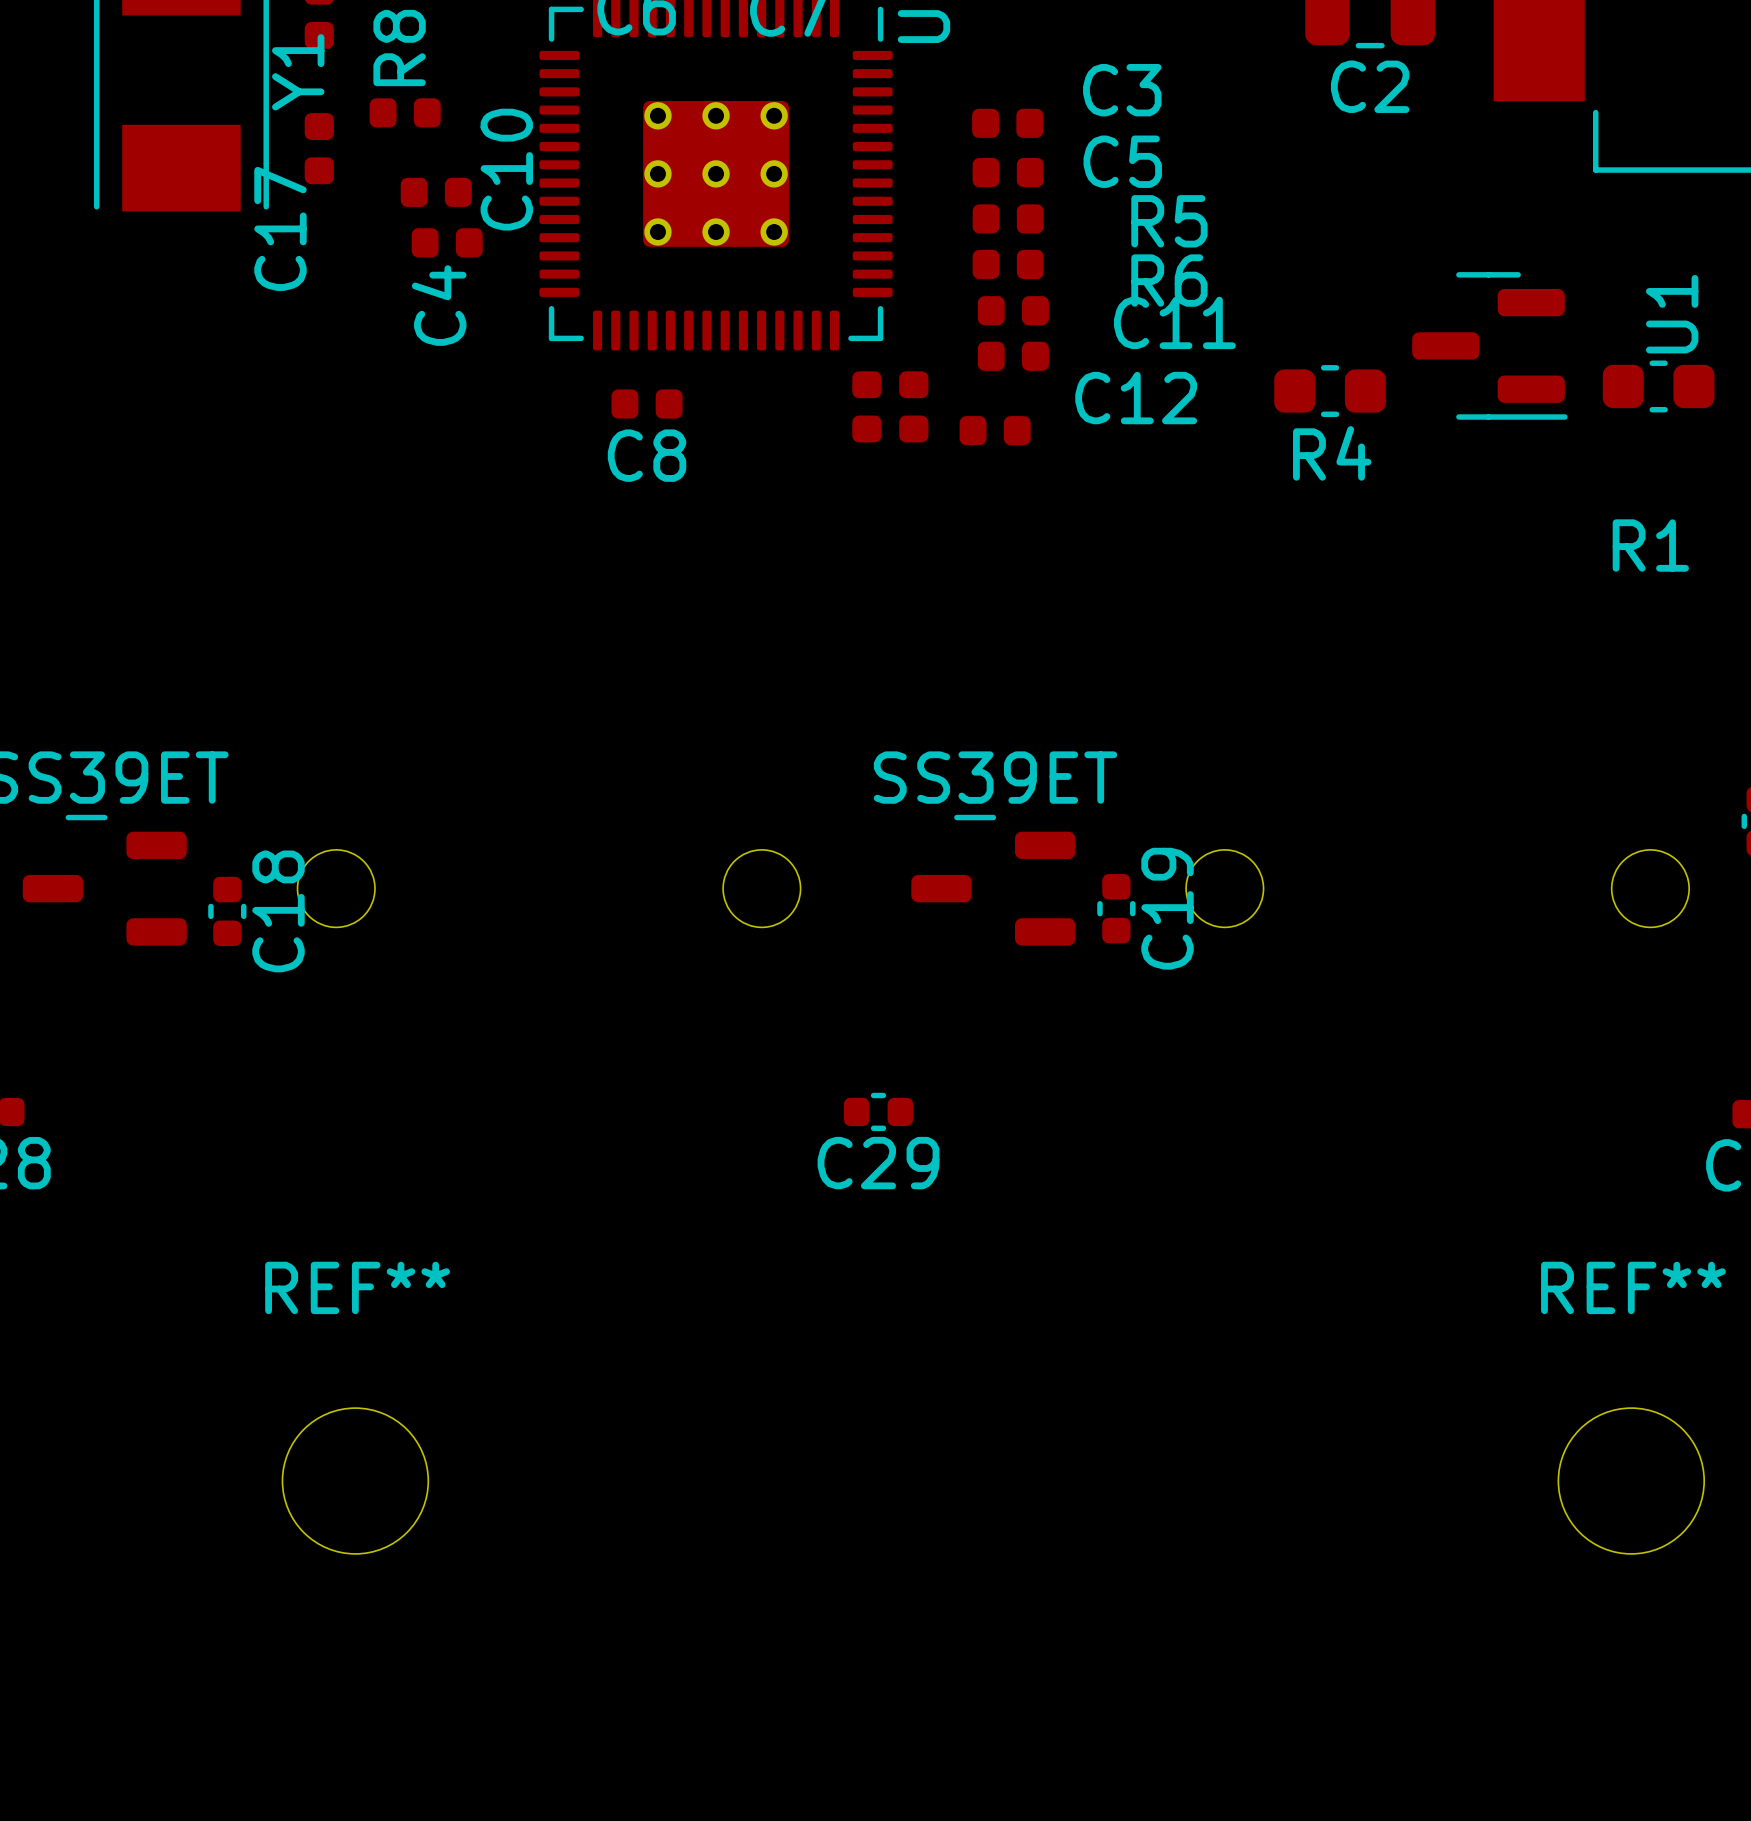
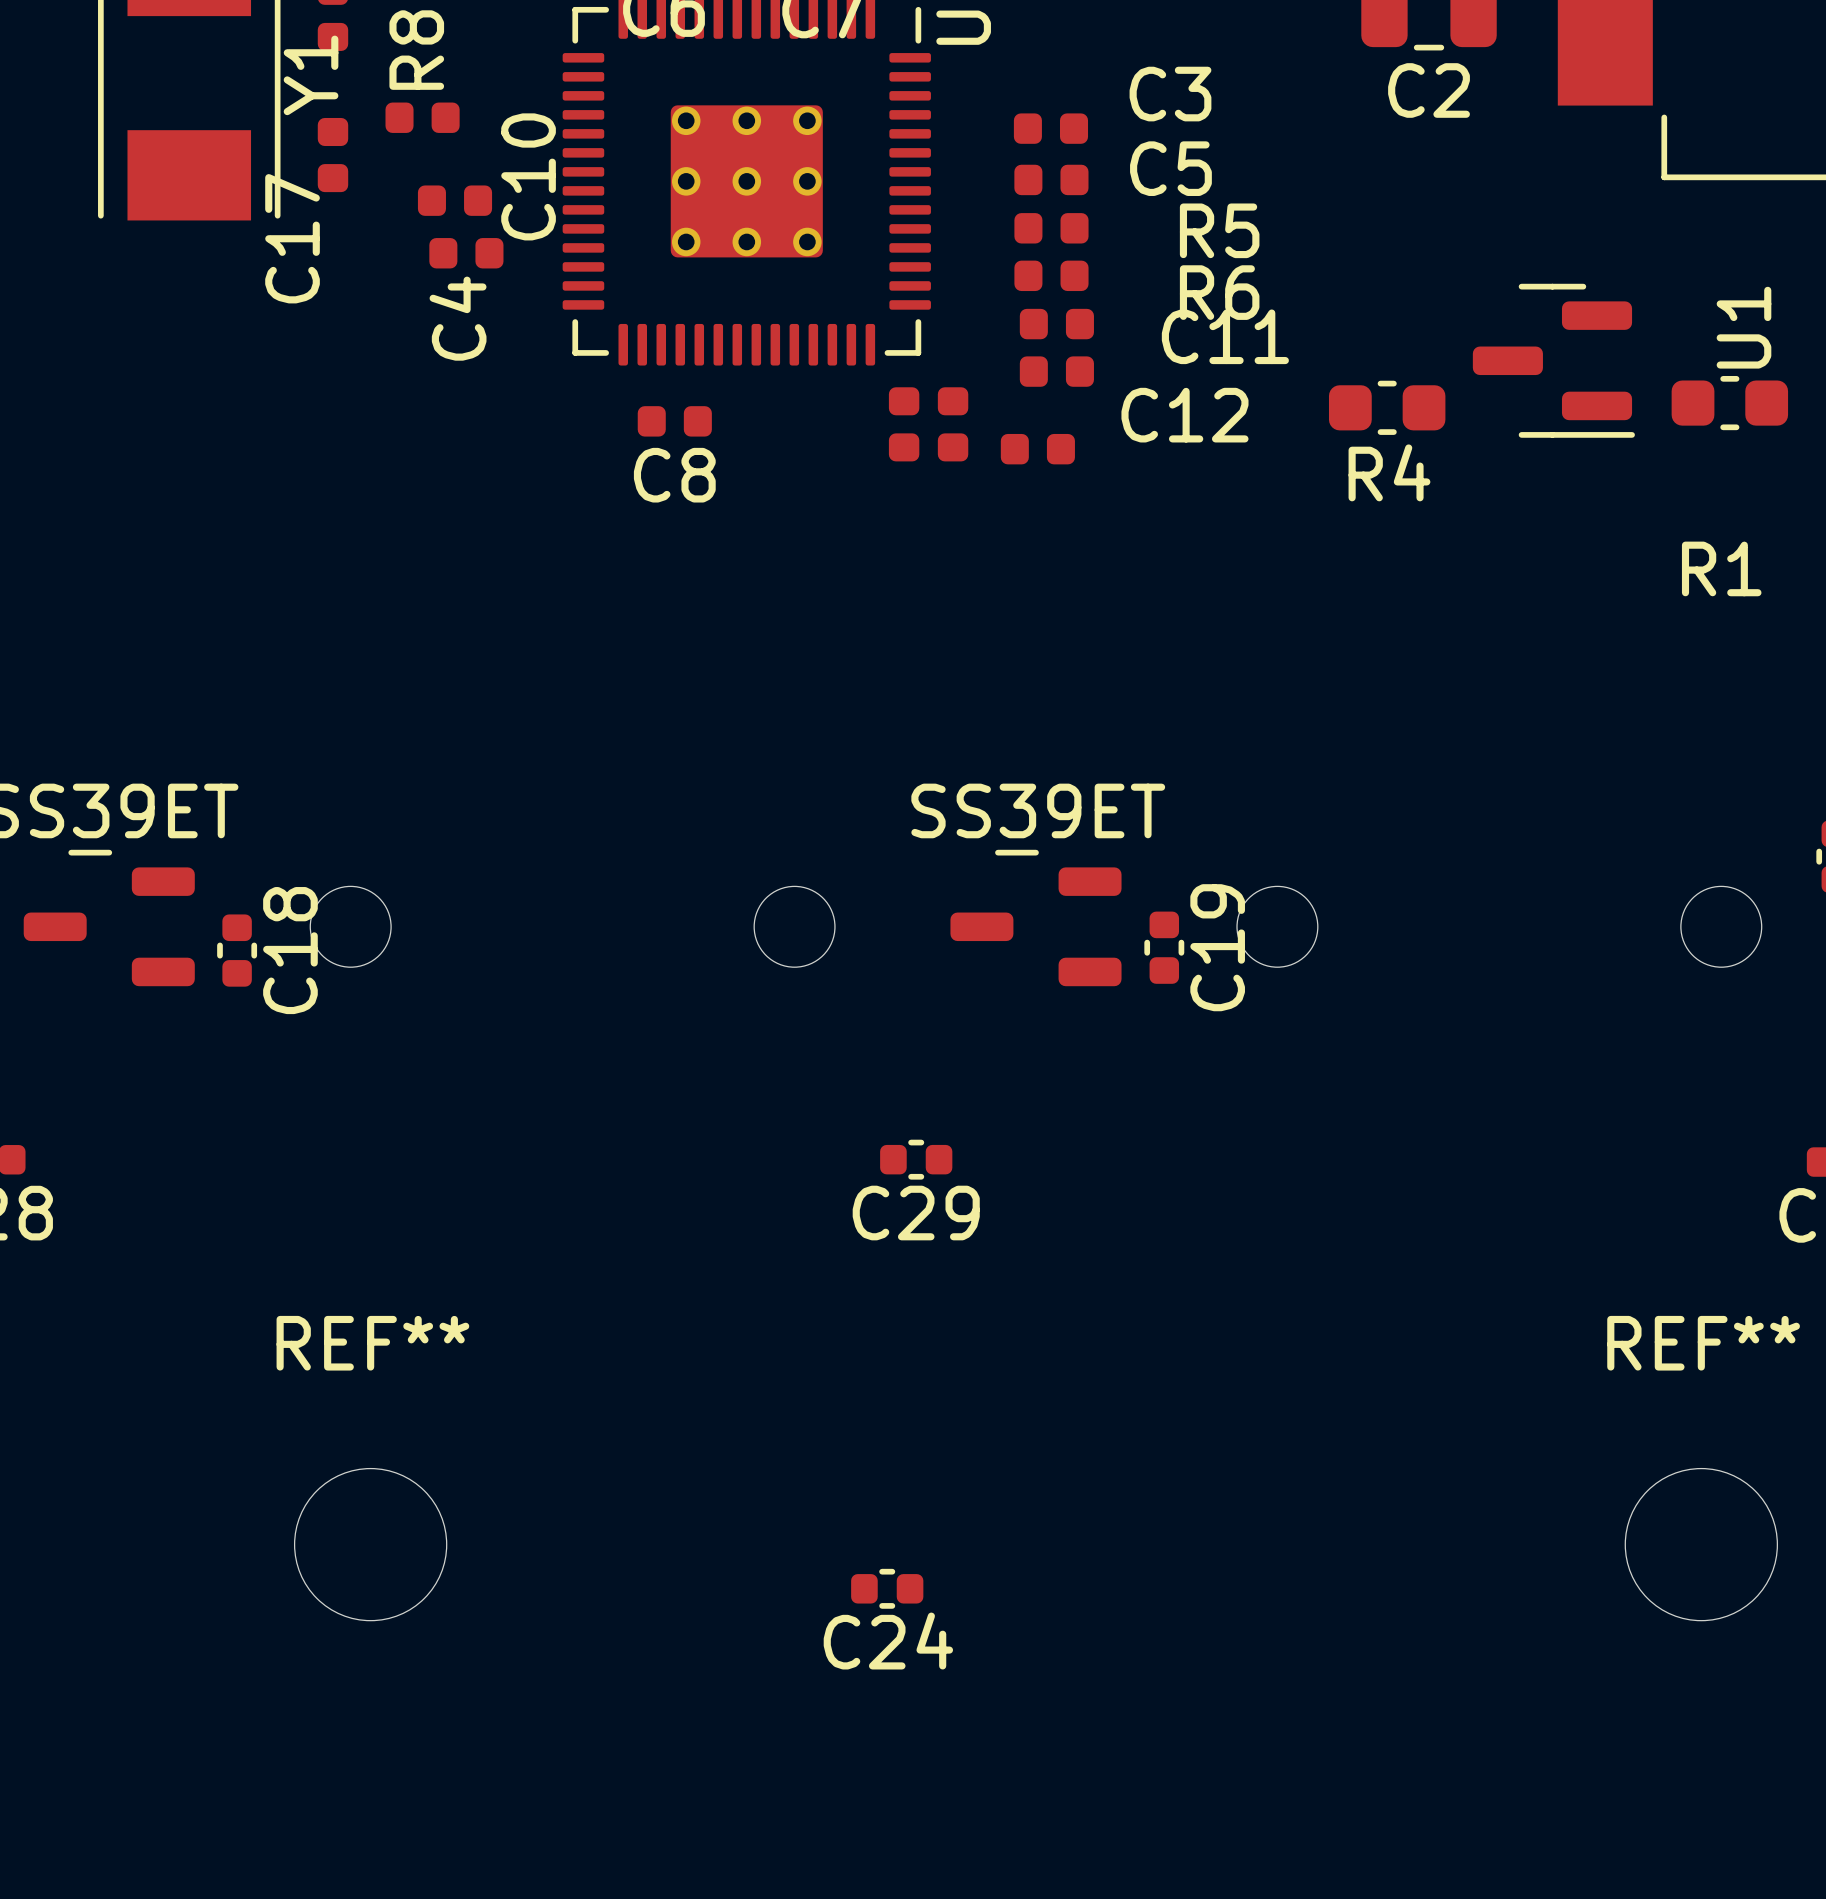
C24: none -> (887, 1588)

